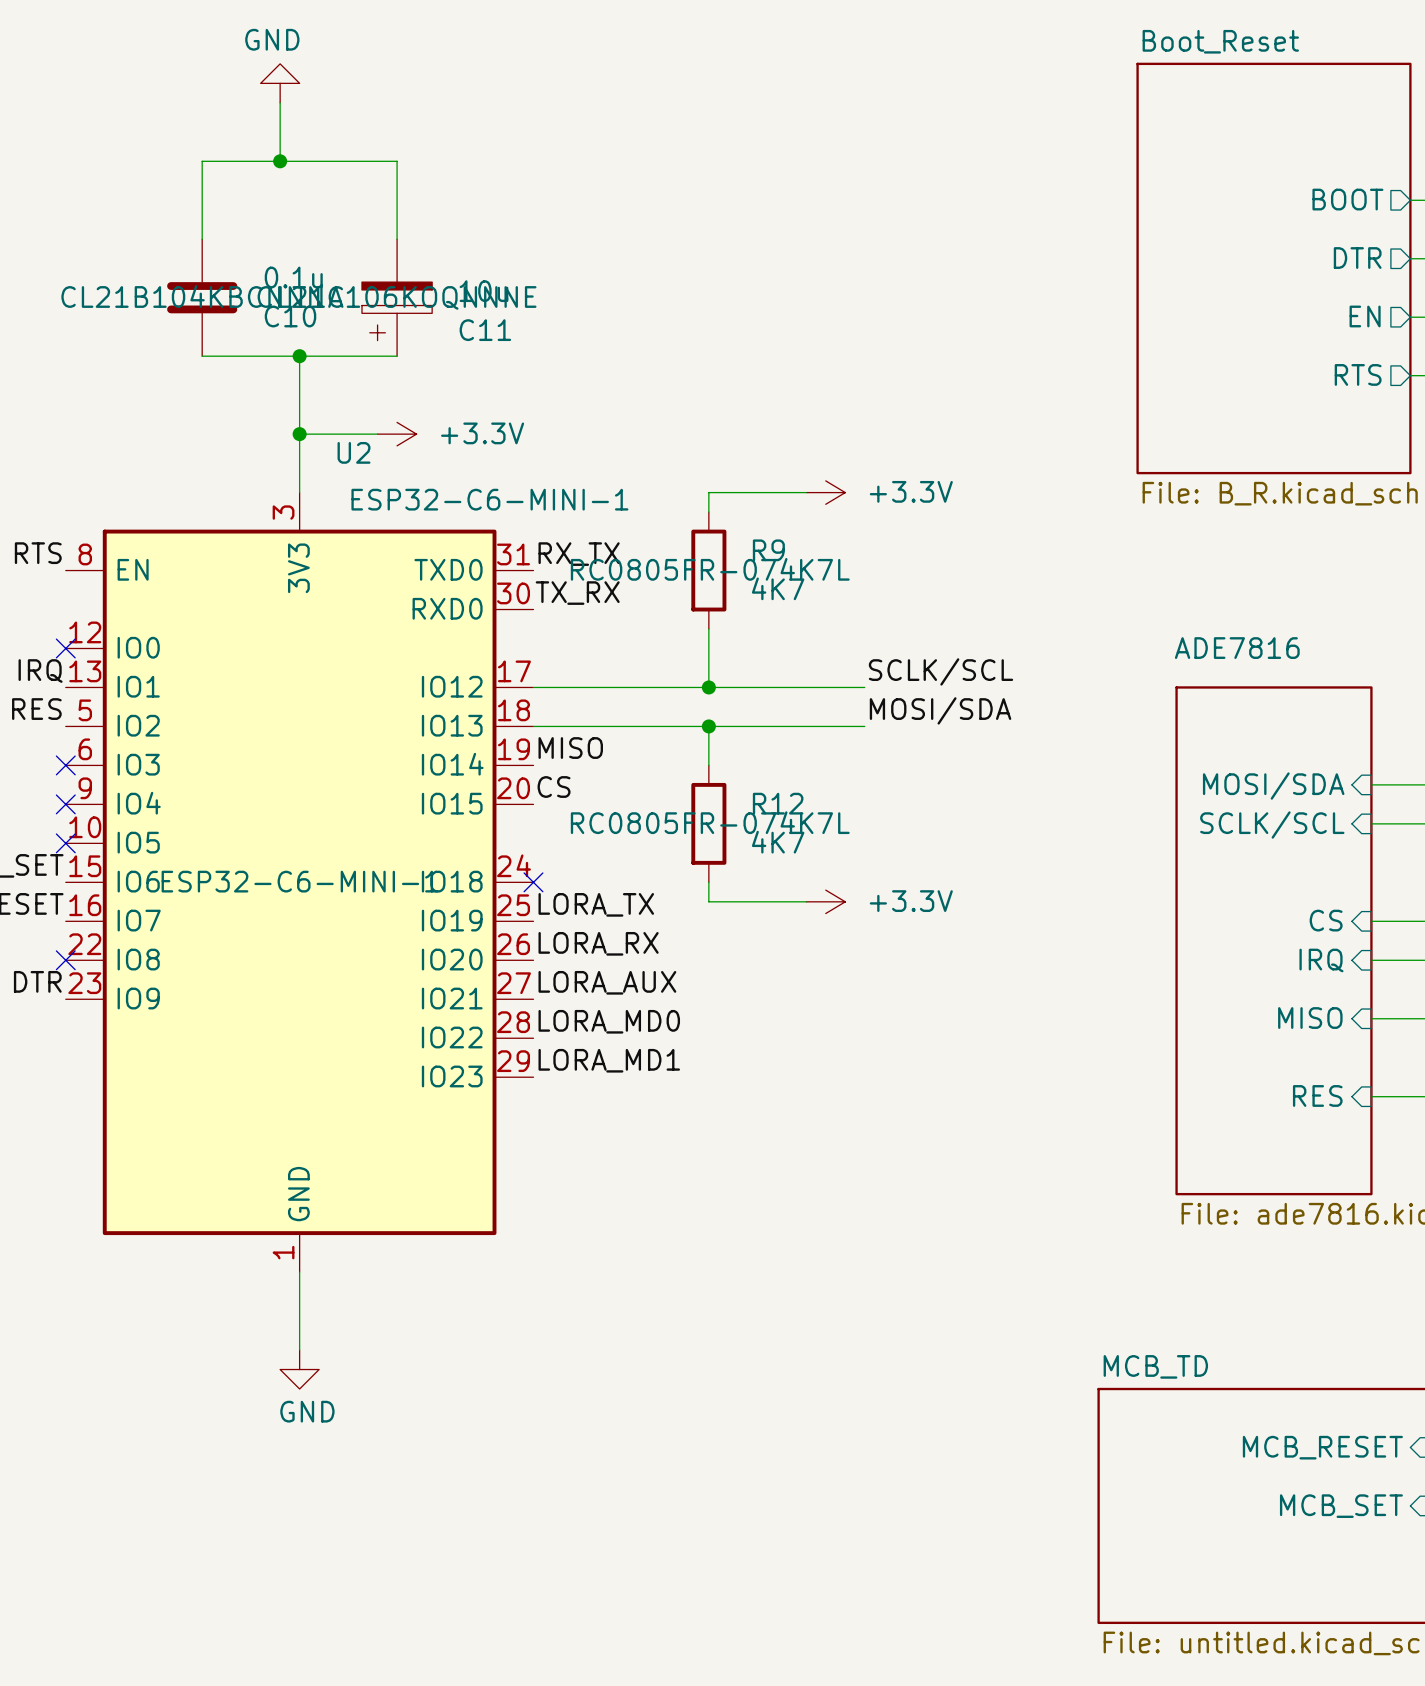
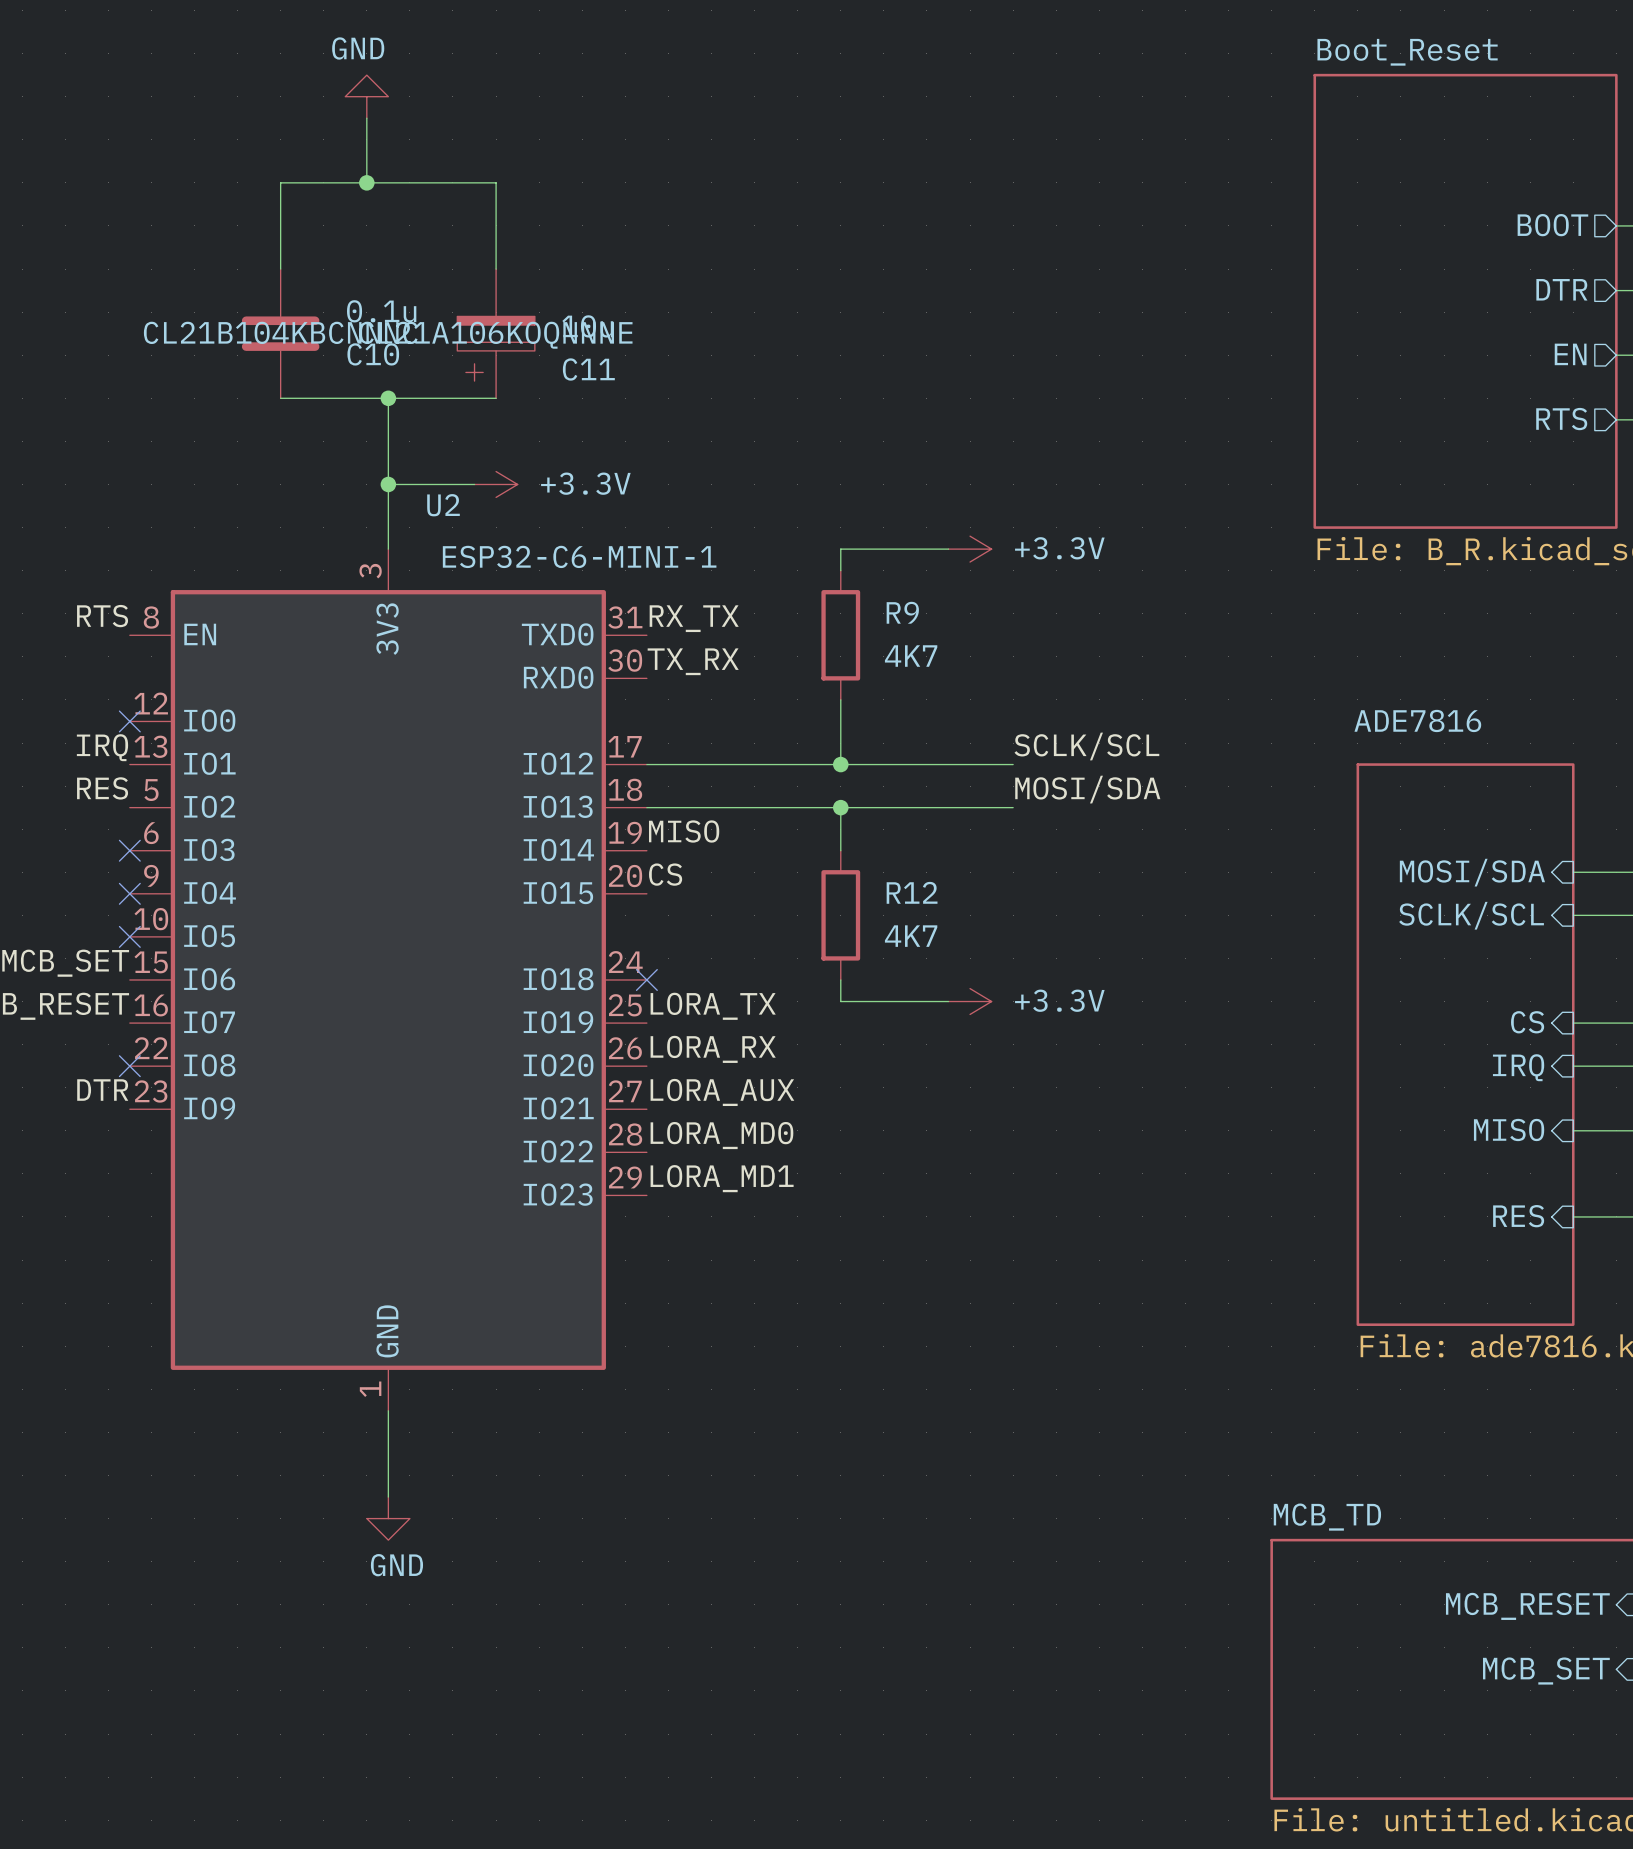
R9 text: RC0805FR-074K7L (710, 569) -> none
R12 text: RC0805FR-074K7L (710, 822) -> none
U2 text: ESP32-C6-MINI-1 (300, 881) -> none

